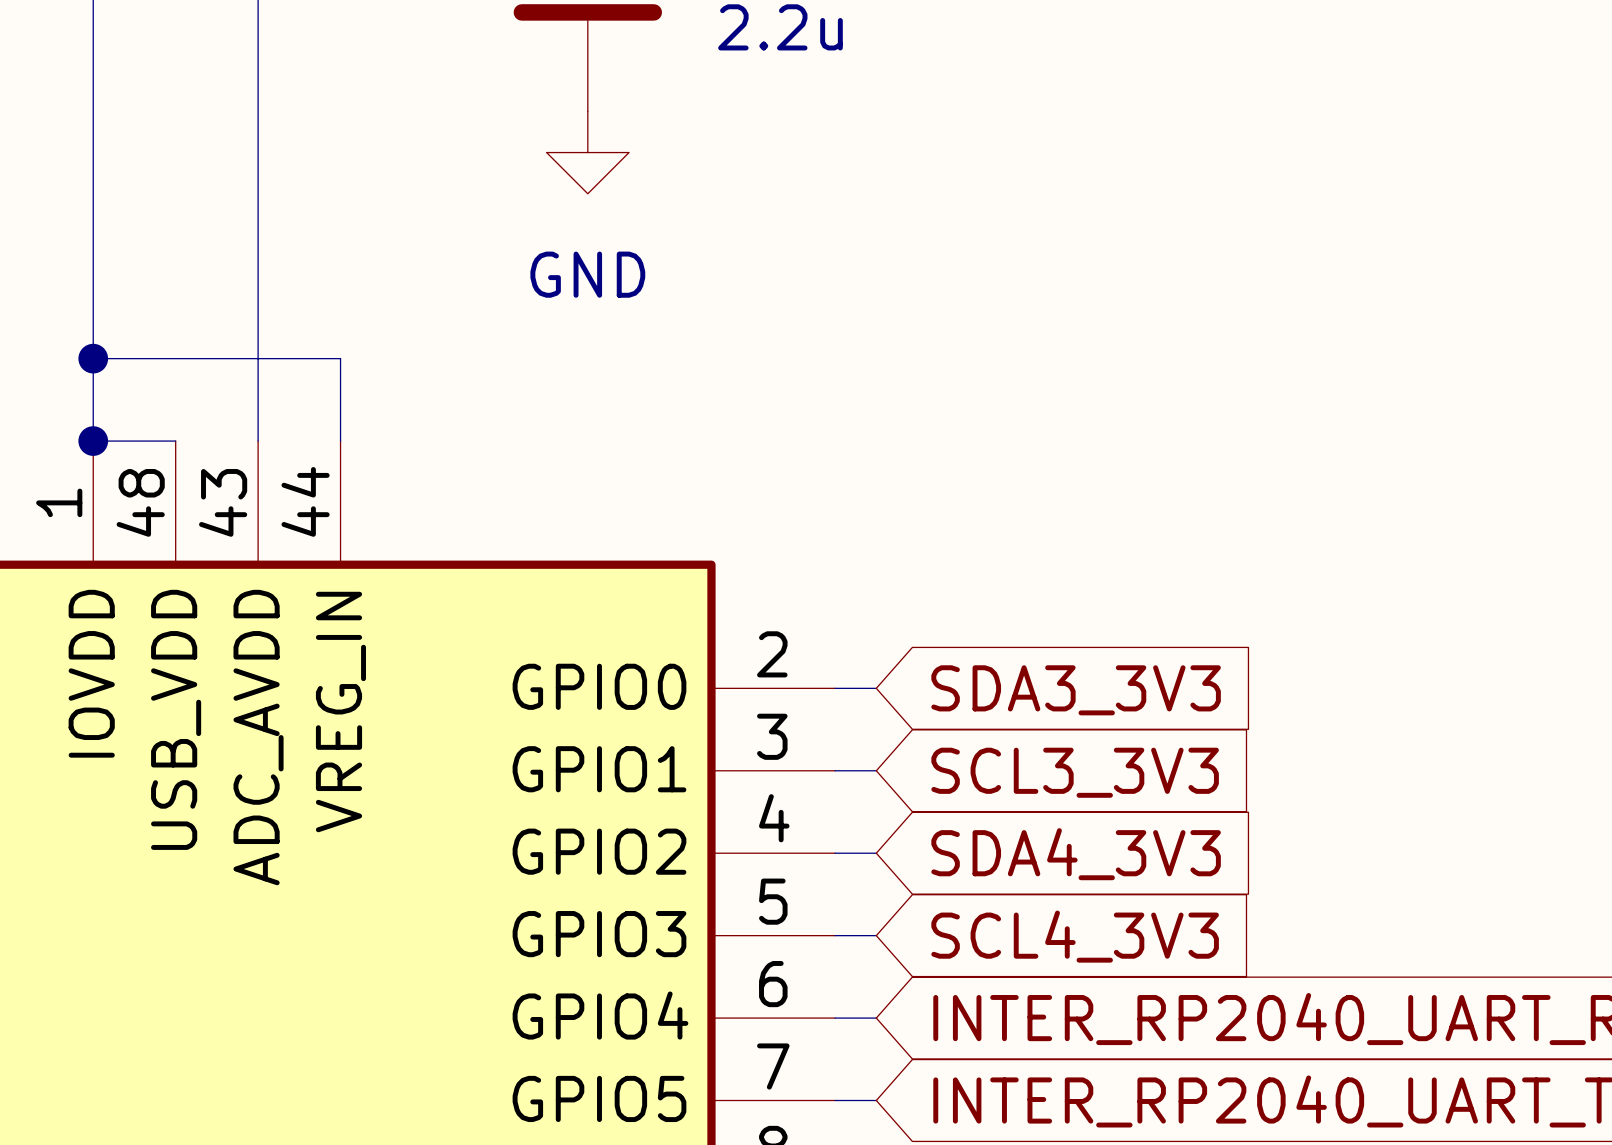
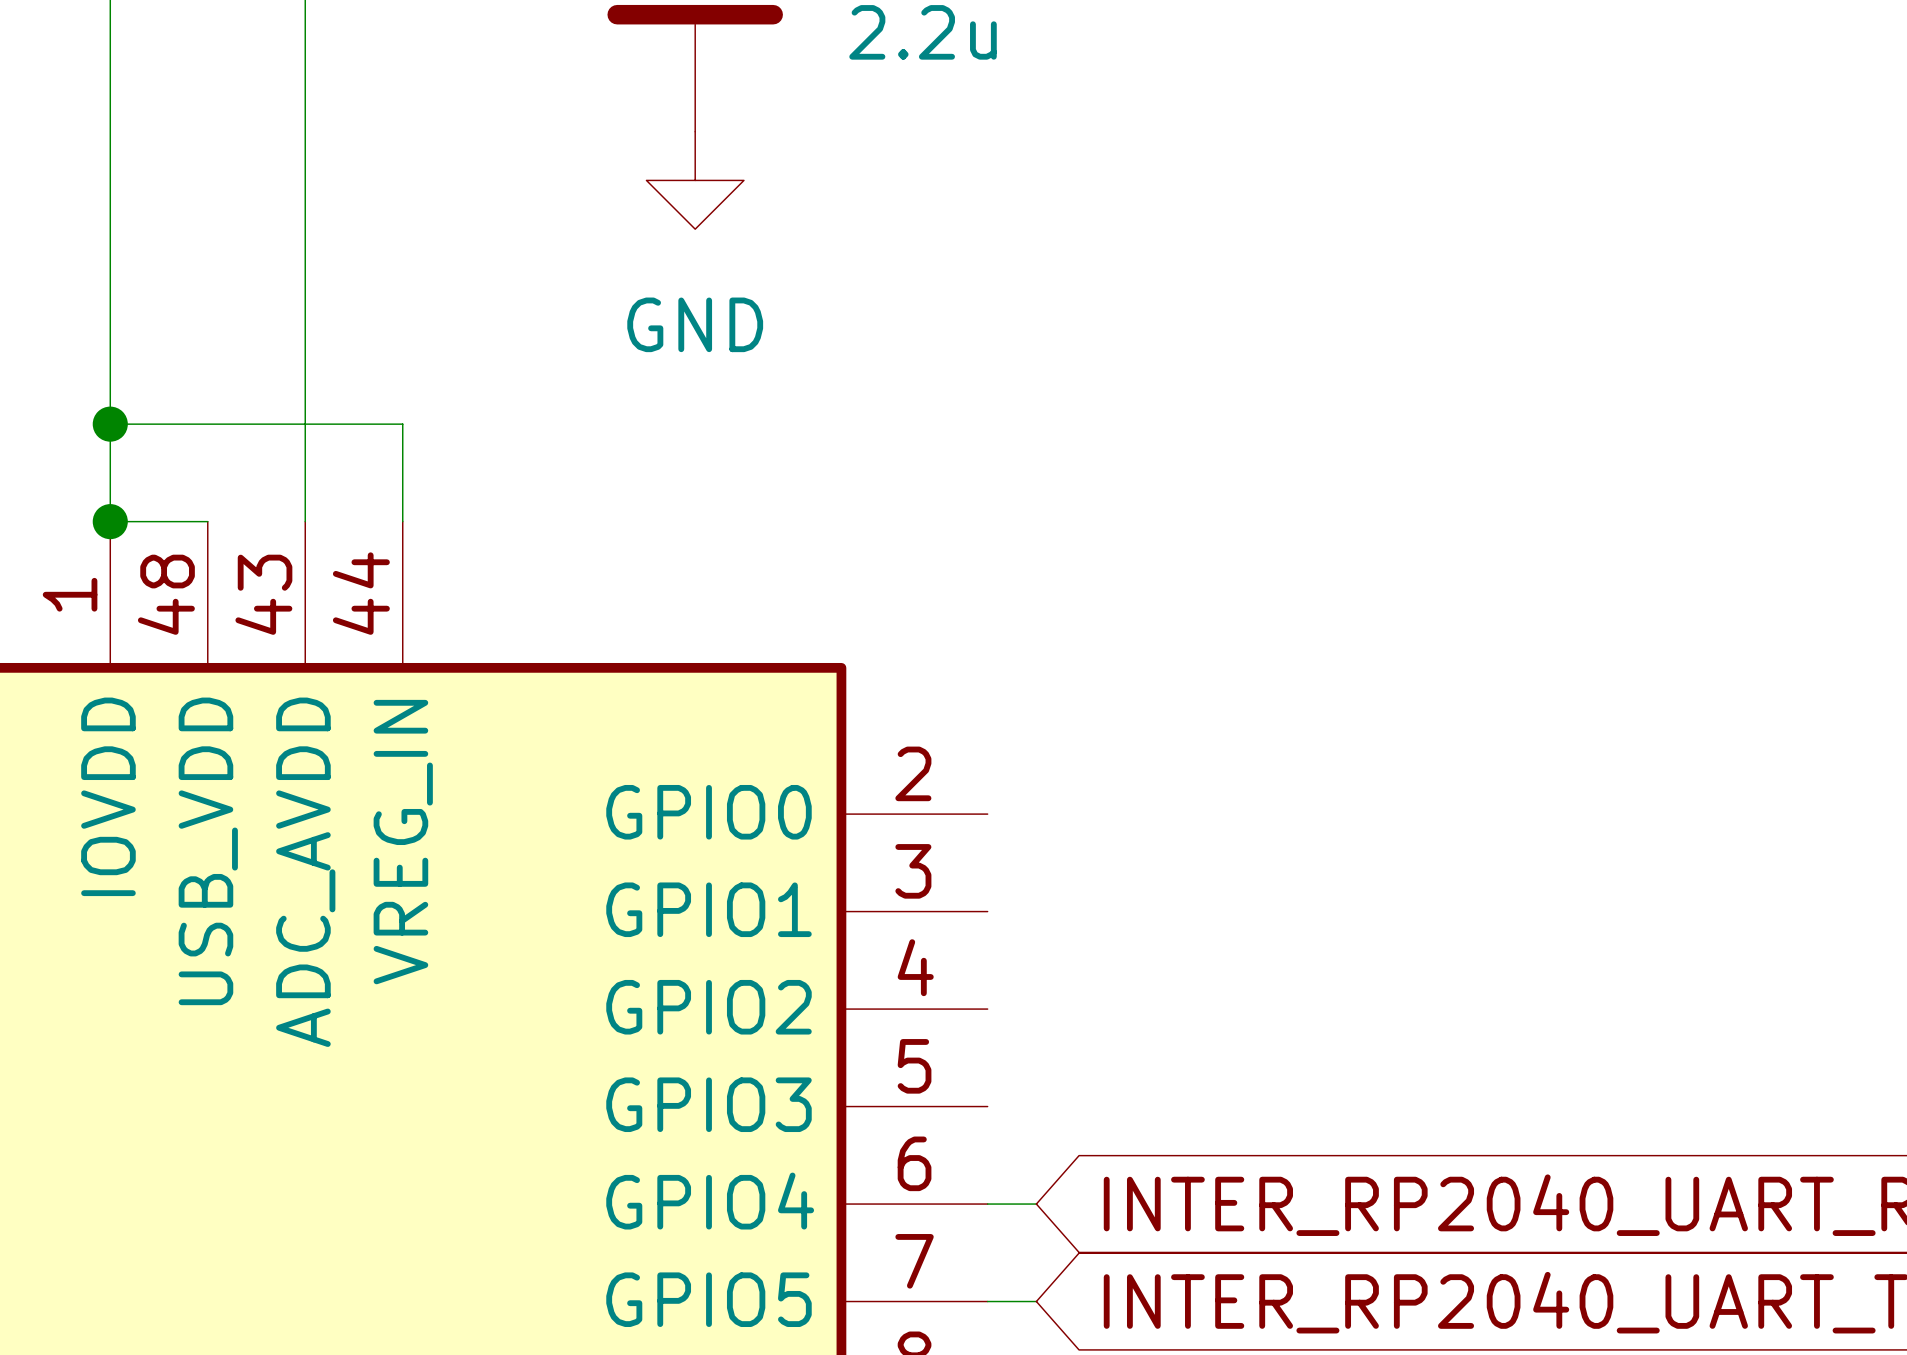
wire: (835, 688) (876, 688) -> none
global label: SDA3_3V3 (1076, 690) -> none
wire: (835, 770) (876, 770) -> none
global label: SCL3_3V3 (1075, 772) -> none
wire: (835, 853) (876, 853) -> none
global label: SDA4_3V3 (1076, 854) -> none
wire: (835, 935) (876, 935) -> none
global label: SCL4_3V3 (1075, 936) -> none

